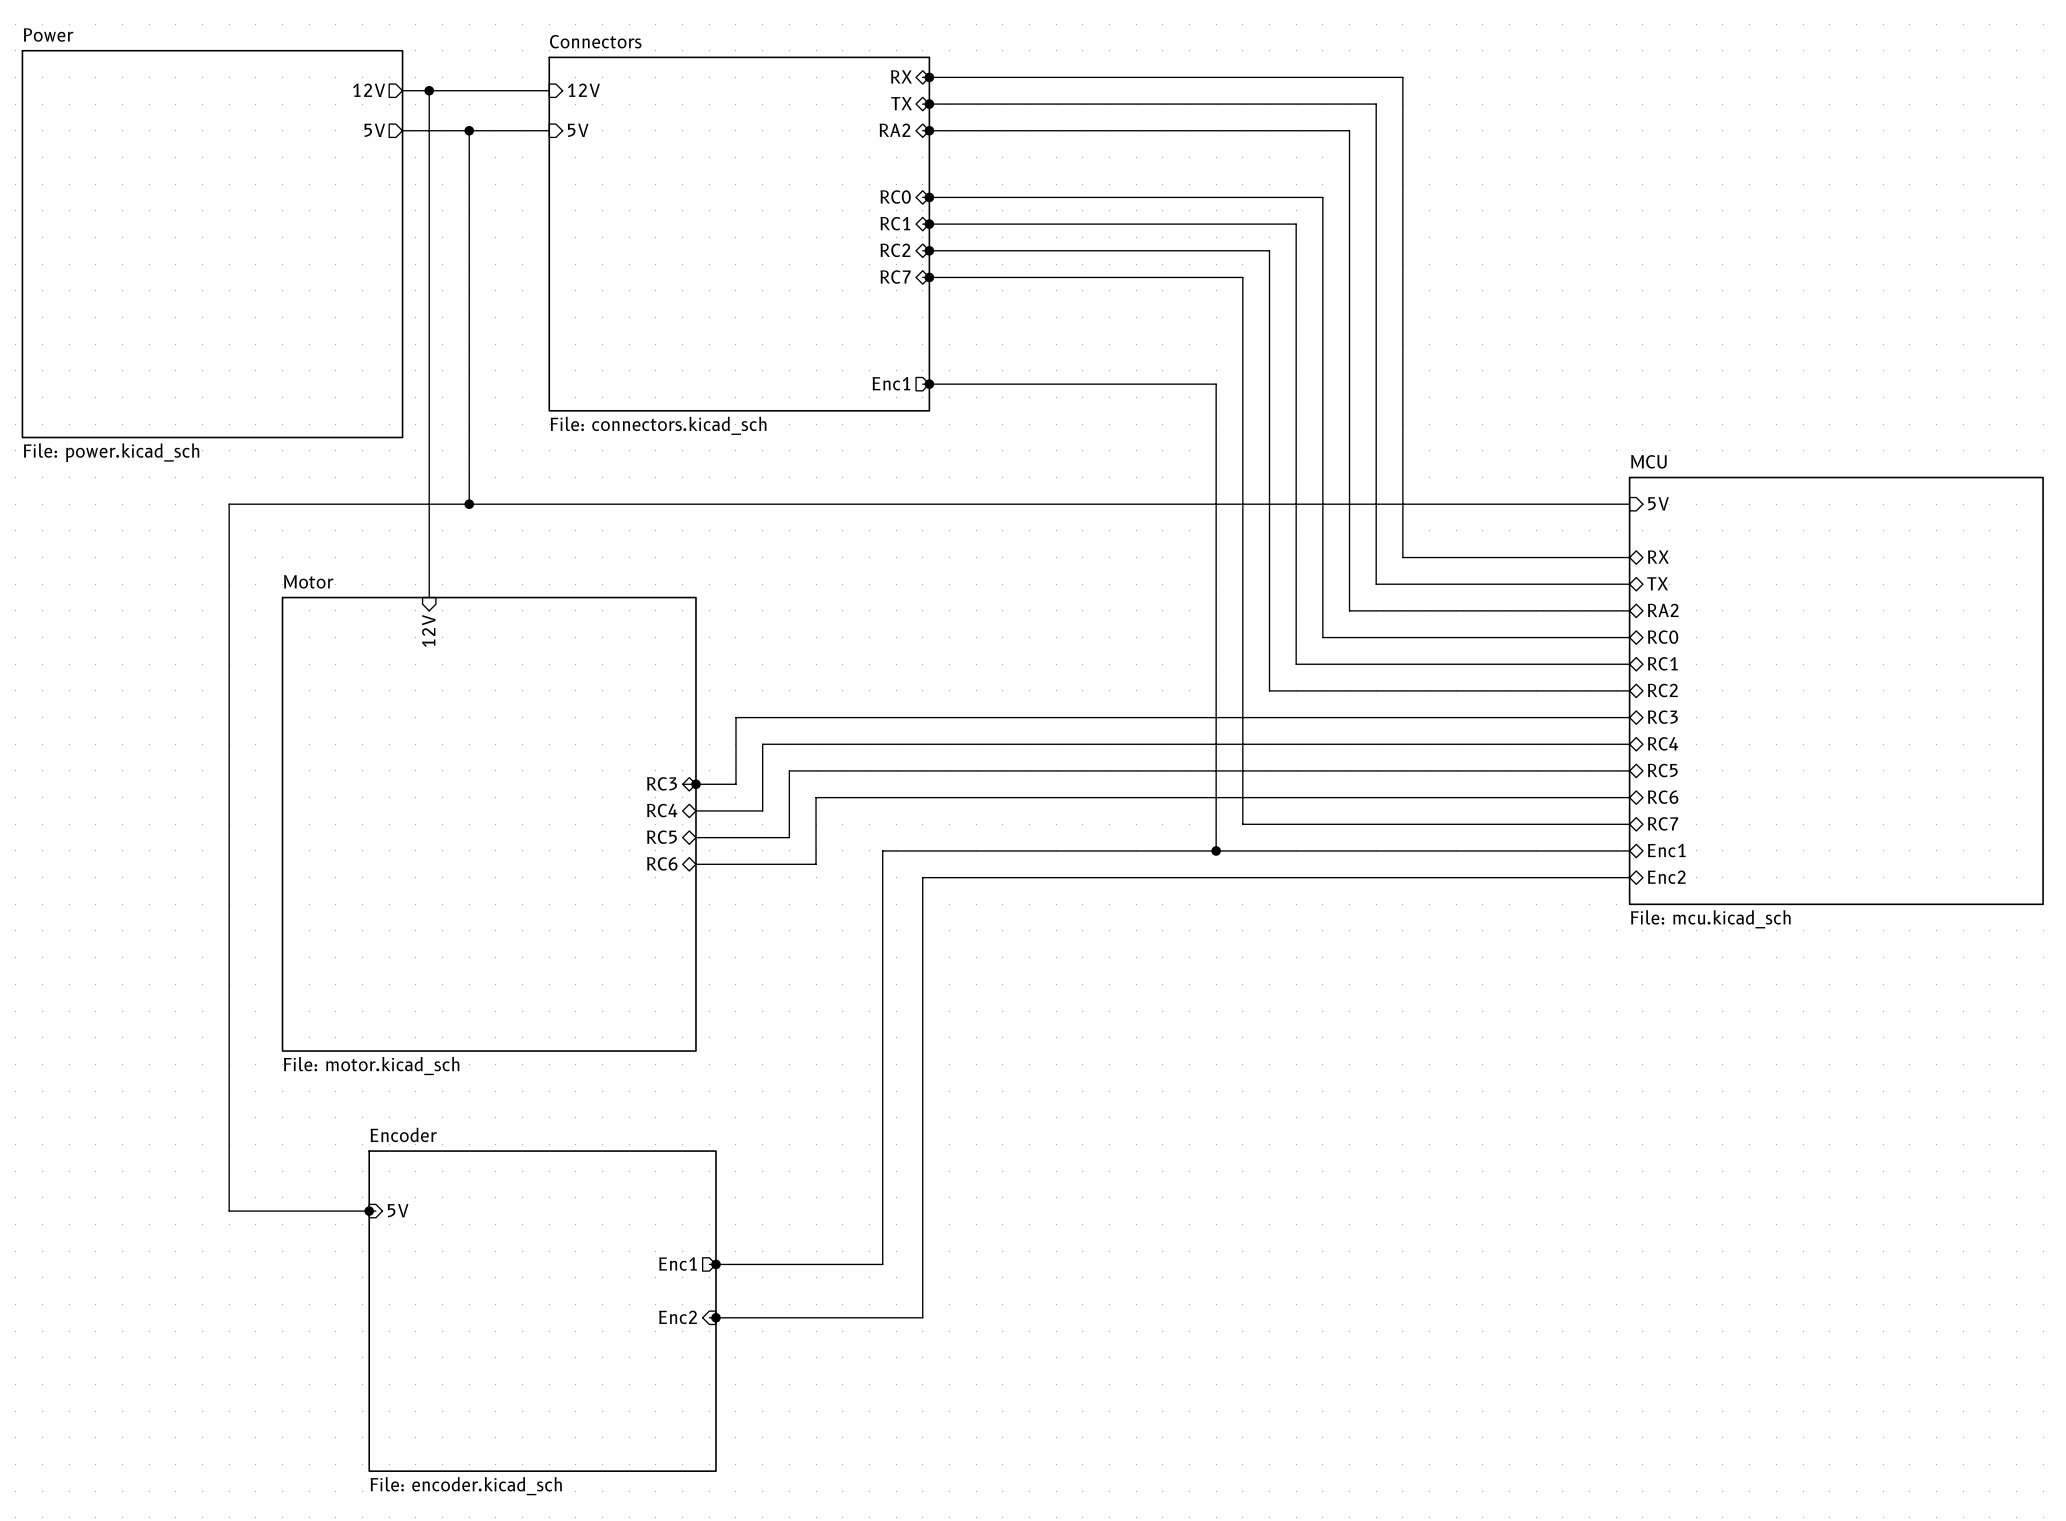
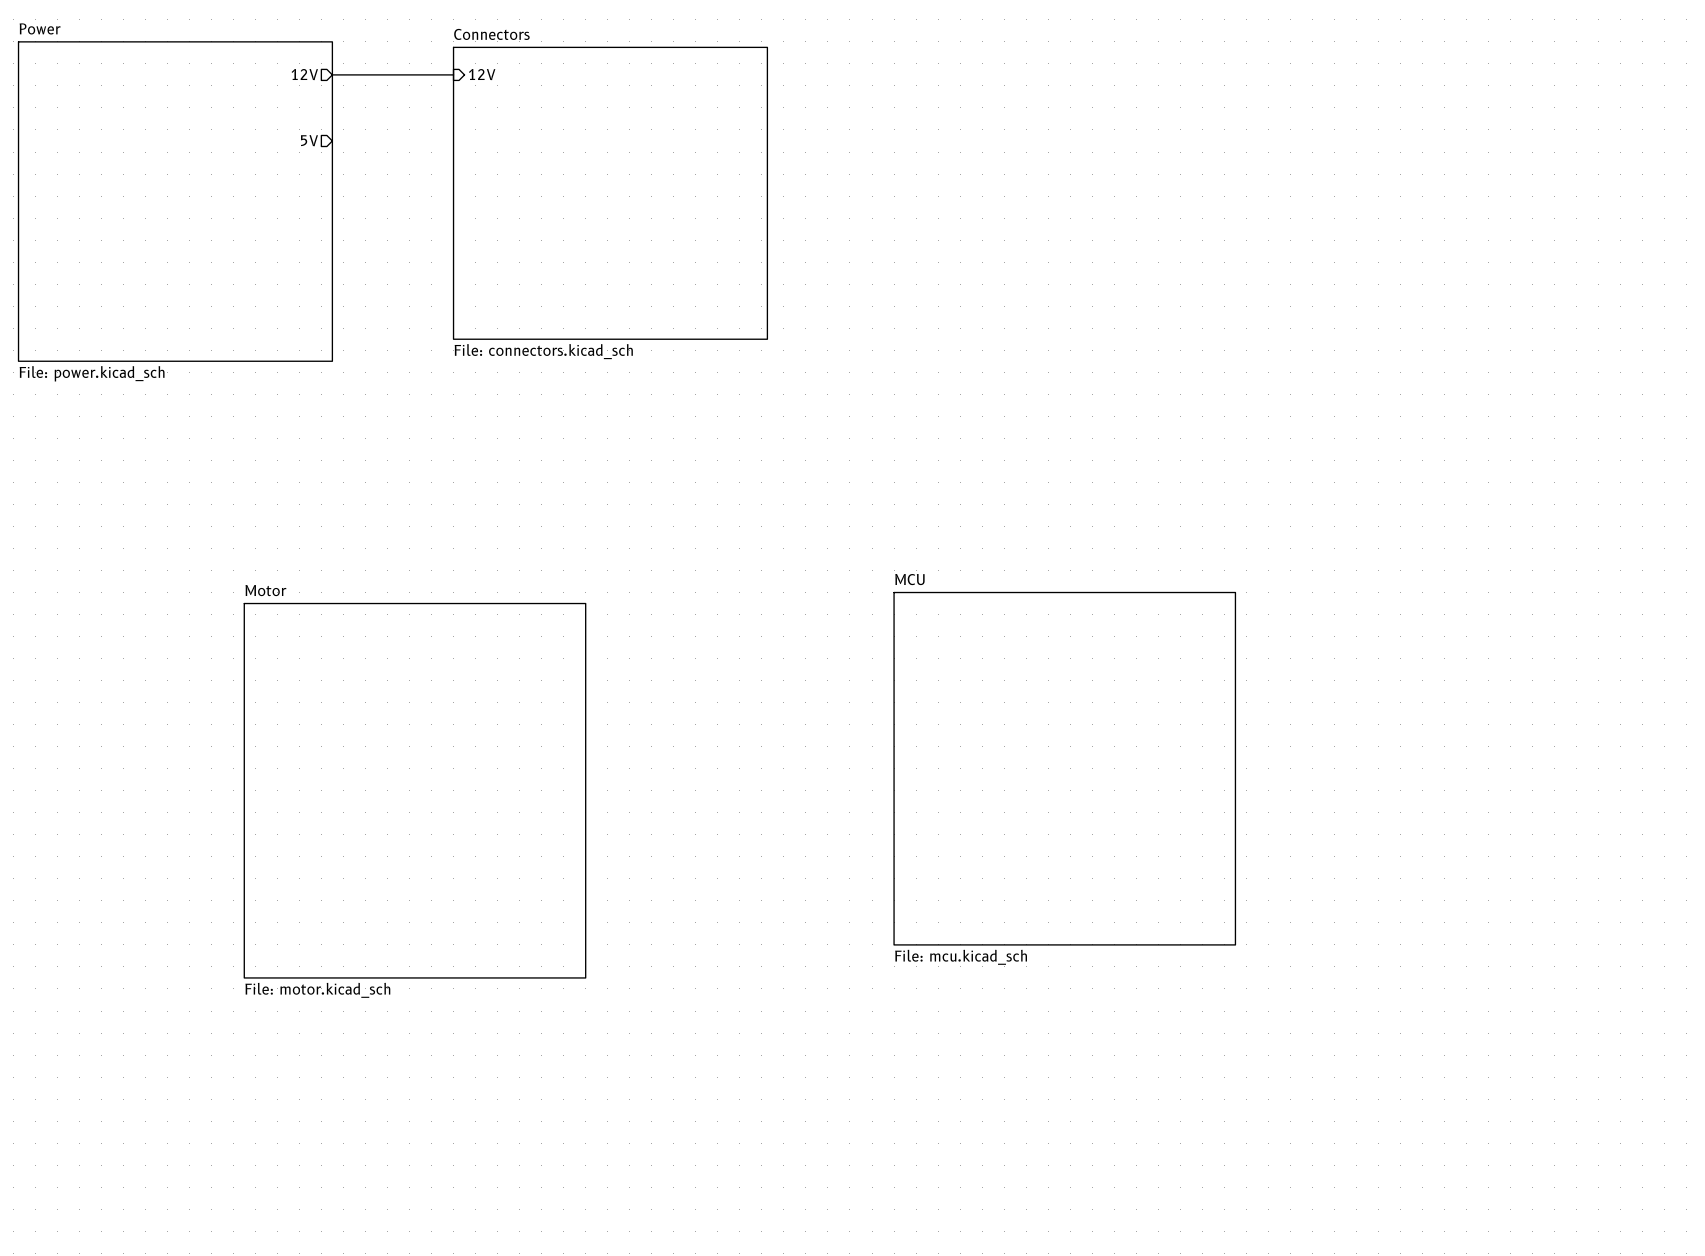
sheet pin: RX (901, 76) -> none
wire: (922, 77) (1402, 77) (1402, 557) (1629, 557) -> none
junction: (929, 77) -> none
wire: (429, 90) (429, 597) -> none
junction: (429, 90) -> none
sheet pin: TX (901, 103) -> none
wire: (922, 104) (1376, 104) (1376, 584) (1629, 584) -> none
junction: (929, 104) -> none
sheet pin position: 5V (374, 130) -> 5V (309, 140)
wire: (402, 130) (549, 130) -> none
wire: (469, 130) (469, 504) -> none
junction: (469, 130) -> none
sheet pin: 5V (578, 130) -> none
sheet pin: RA2 (894, 130) -> none
wire: (922, 130) (1349, 130) (1349, 610) (1629, 610) -> none
junction: (929, 130) -> none
sheet pin: RC0 (895, 197) -> none
wire: (922, 197) (1322, 197) (1322, 637) (1629, 637) -> none
junction: (929, 197) -> none
sheet pin: RC1 (895, 223) -> none
wire: (922, 224) (1296, 224) (1296, 664) (1629, 664) -> none
junction: (929, 224) -> none
sheet pin: RC2 (895, 250) -> none
wire: (922, 250) (1269, 250) (1269, 690) (1629, 690) -> none
junction: (929, 250) -> none
sheet pin: RC7 (895, 277) -> none
wire: (922, 277) (1242, 277) (1242, 824) (1629, 824) -> none
junction: (929, 277) -> none
sheet pin: Enc1 (891, 383) -> none
wire: (922, 384) (1216, 384) (1216, 850) -> none
junction: (929, 384) -> none
sheet pin: 5V (1658, 503) -> none
junction: (469, 504) -> none
wire: (1629, 504) (229, 504) (229, 1211) (375, 1211) -> none
sheet pin: RX (1658, 557) -> none
sheet pin: TX (1657, 583) -> none
sheet pin: RA2 (1663, 610) -> none
sheet pin: 12V (428, 631) -> none
sheet pin: RC0 (1663, 637) -> none
sheet pin: RC1 (1662, 663) -> none
sheet pin: RC2 (1662, 690) -> none
sheet MCU: File: mcu.kicad_sch (1836, 690) -> none
wire: (1629, 717) (735, 717) (735, 784) (682, 784) -> none
sheet pin: RC3 (1662, 717) -> none
sheet pin: RC4 (1663, 743) -> none
wire: (1629, 744) (762, 744) (762, 810) (695, 810) -> none
wire: (1629, 770) (789, 770) (789, 837) (695, 837) -> none
sheet pin: RC5 (1662, 770) -> none
sheet pin: RC3 (661, 783) -> none
junction: (695, 784) -> none
wire: (1629, 797) (816, 797) (816, 864) (695, 864) -> none
sheet pin: RC6 (1663, 797) -> none
sheet pin: RC4 (662, 810) -> none
sheet pin: RC7 (1663, 823) -> none
sheet Motor position: (489, 824) -> (414, 790)
sheet pin: RC5 (661, 837) -> none
junction: (1216, 850) -> none
wire: (1629, 850) (882, 850) (882, 1264) (709, 1264) -> none
sheet pin: Enc1 (1666, 850) -> none
sheet pin: RC6 (662, 863) -> none
wire: (1629, 877) (922, 877) (922, 1317) (709, 1317) -> none
sheet pin: Enc2 (1666, 877) -> none
sheet MCU: none -> File: mcu.kicad_sch (1064, 768)
sheet pin: 5V (398, 1210) -> none
junction: (369, 1211) -> none
sheet pin: Enc1 (678, 1264) -> none
junction: (715, 1264) -> none
sheet Encoder: File: encoder.kicad_sch (542, 1311) -> none
sheet pin: Enc2 (678, 1317) -> none
junction: (715, 1317) -> none

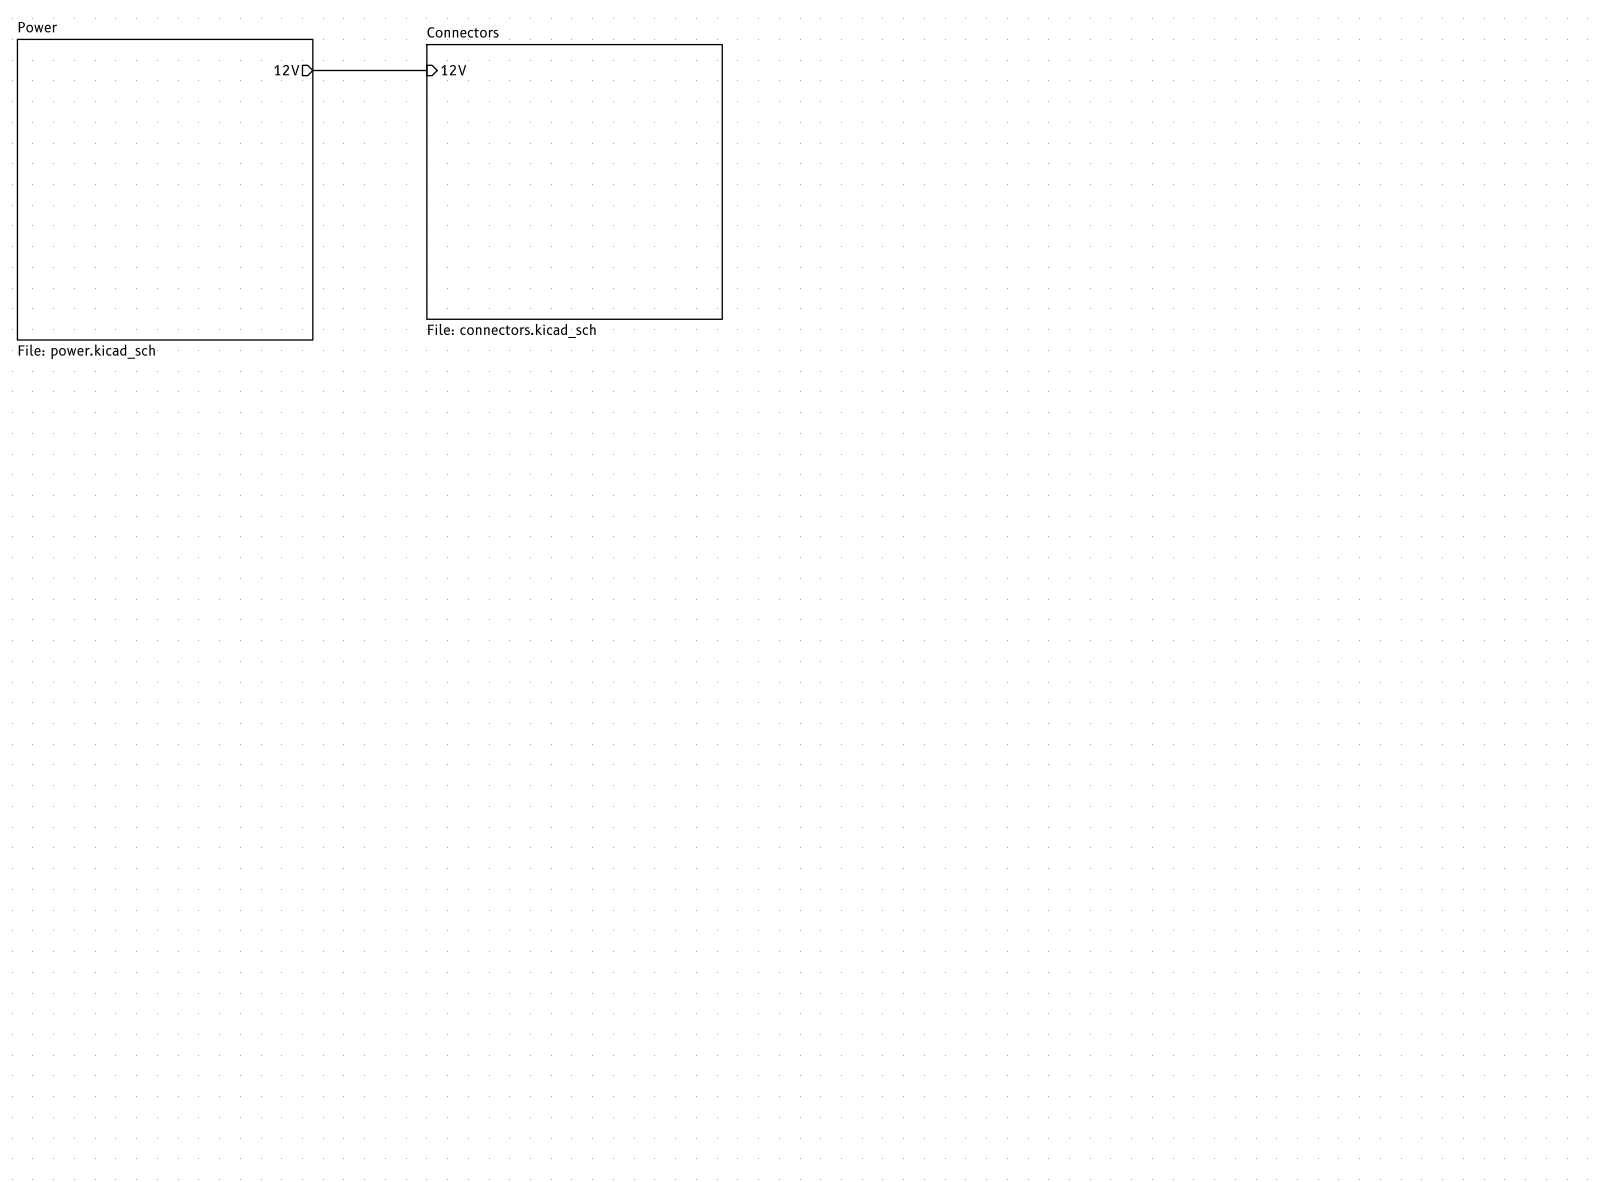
sheet pin: 5V (309, 140) -> none
sheet MCU: File: mcu.kicad_sch (1064, 768) -> none
sheet Motor: File: motor.kicad_sch (414, 790) -> none

